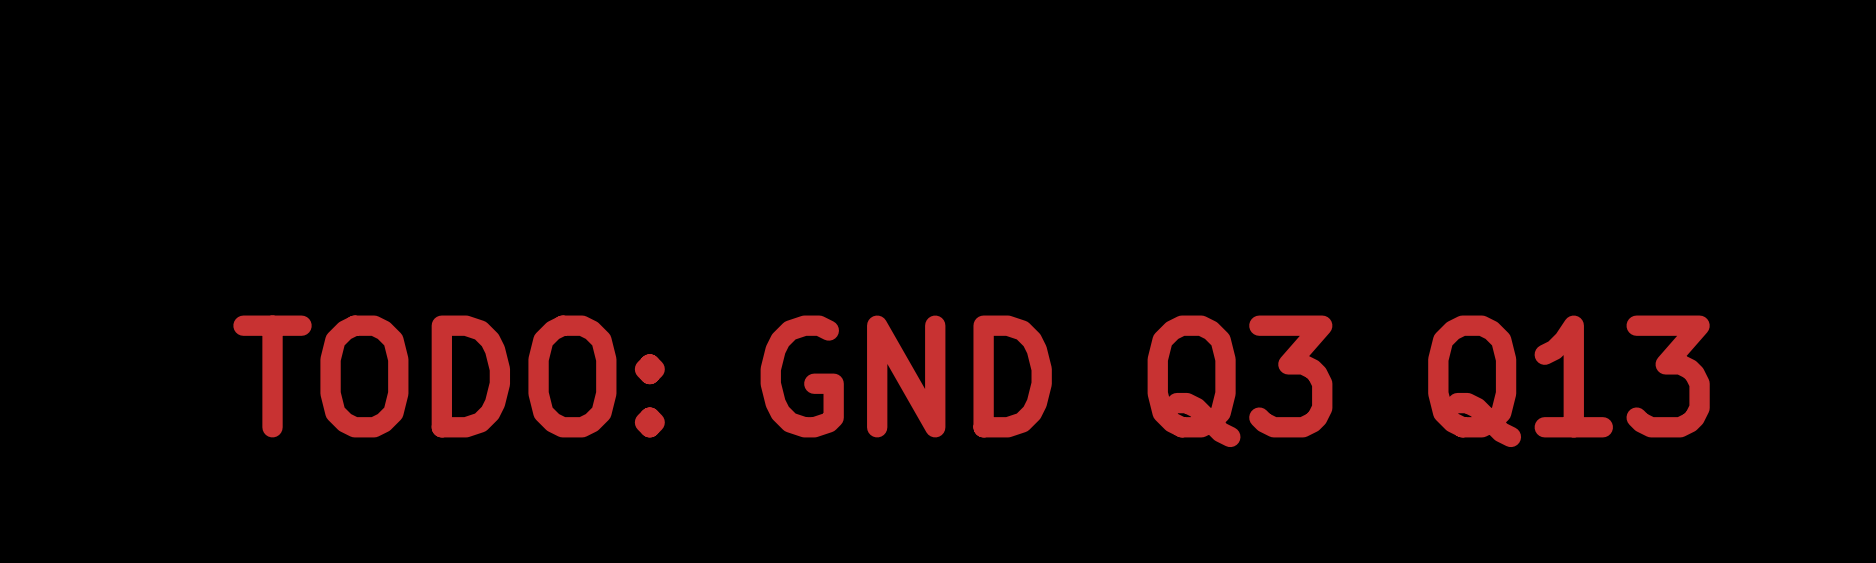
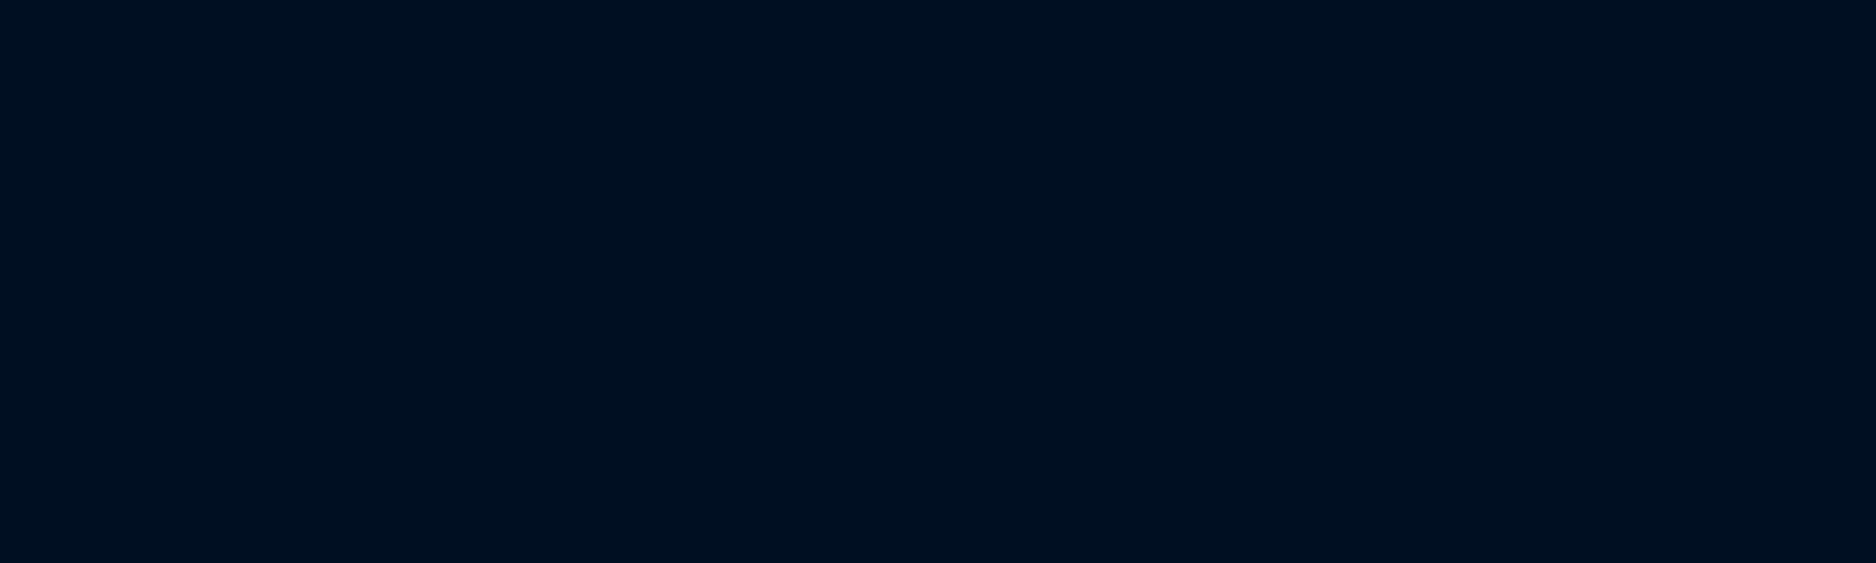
text: TODO: GND Q3 Q13 (971, 381) -> none

